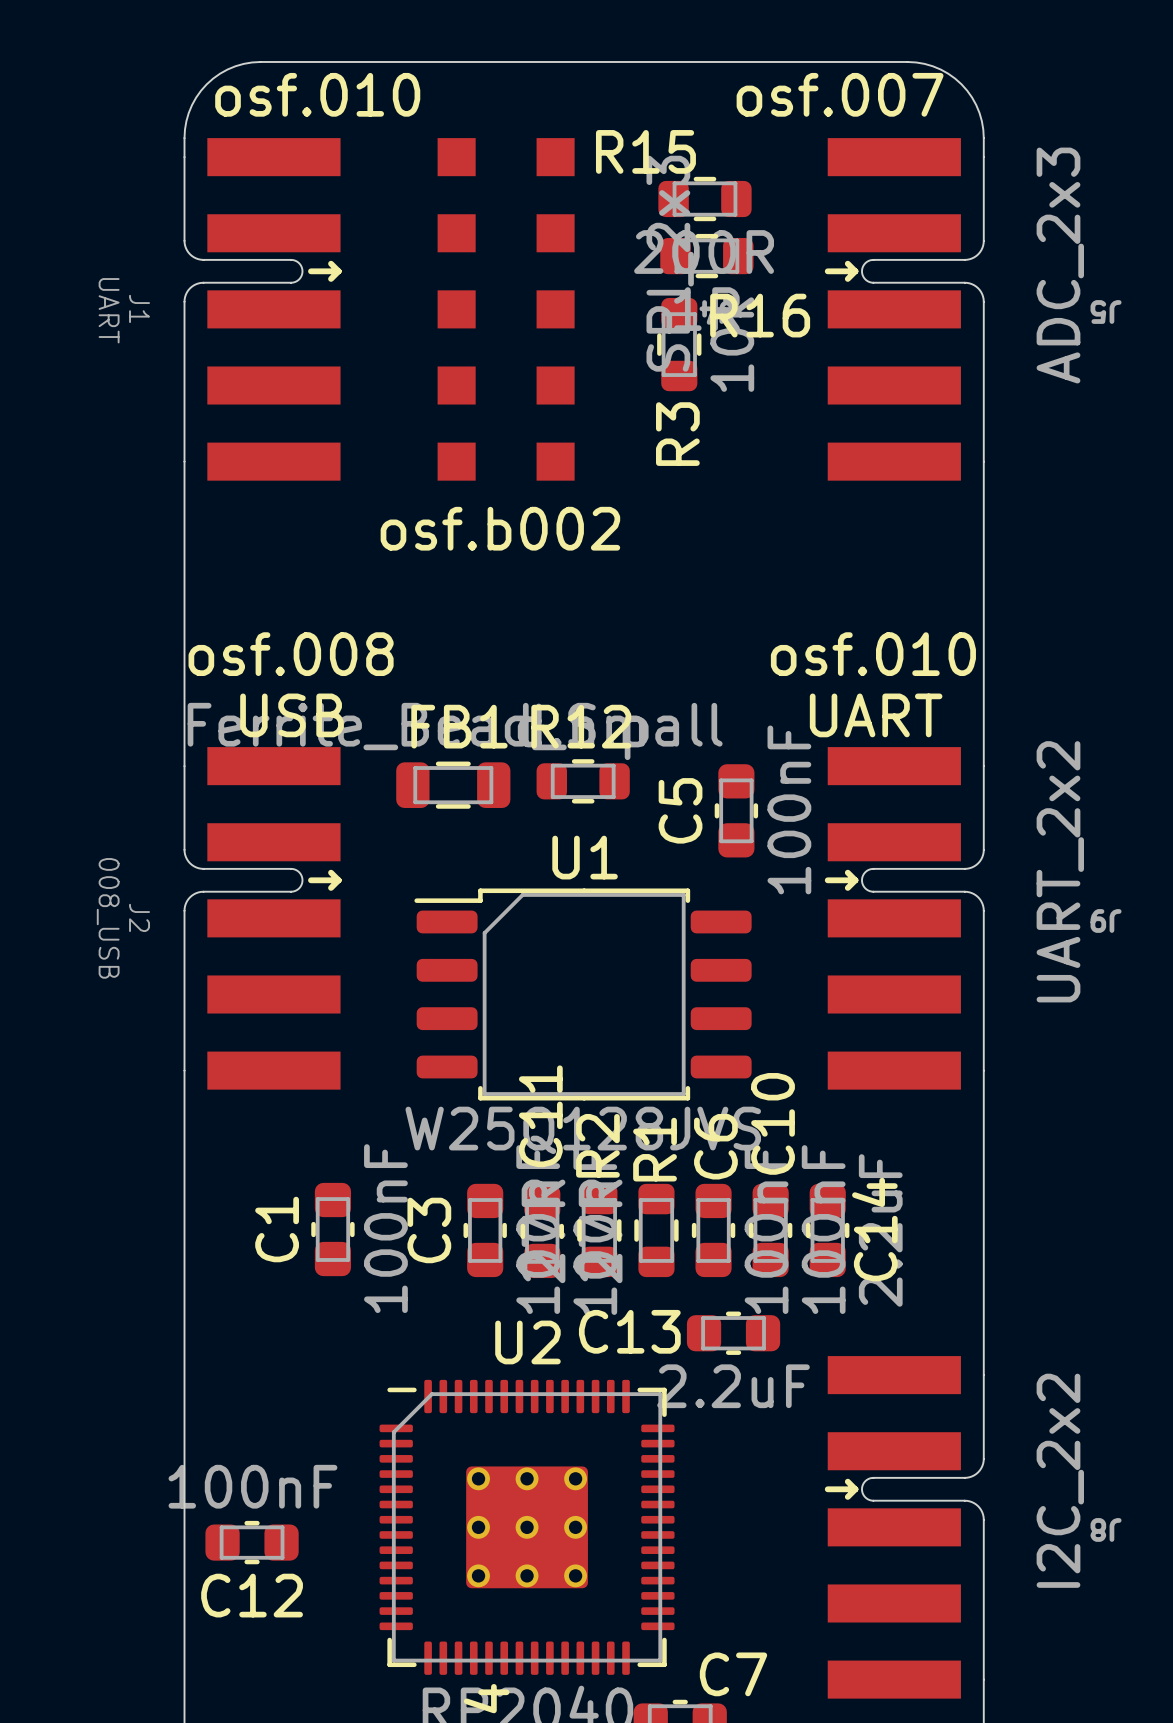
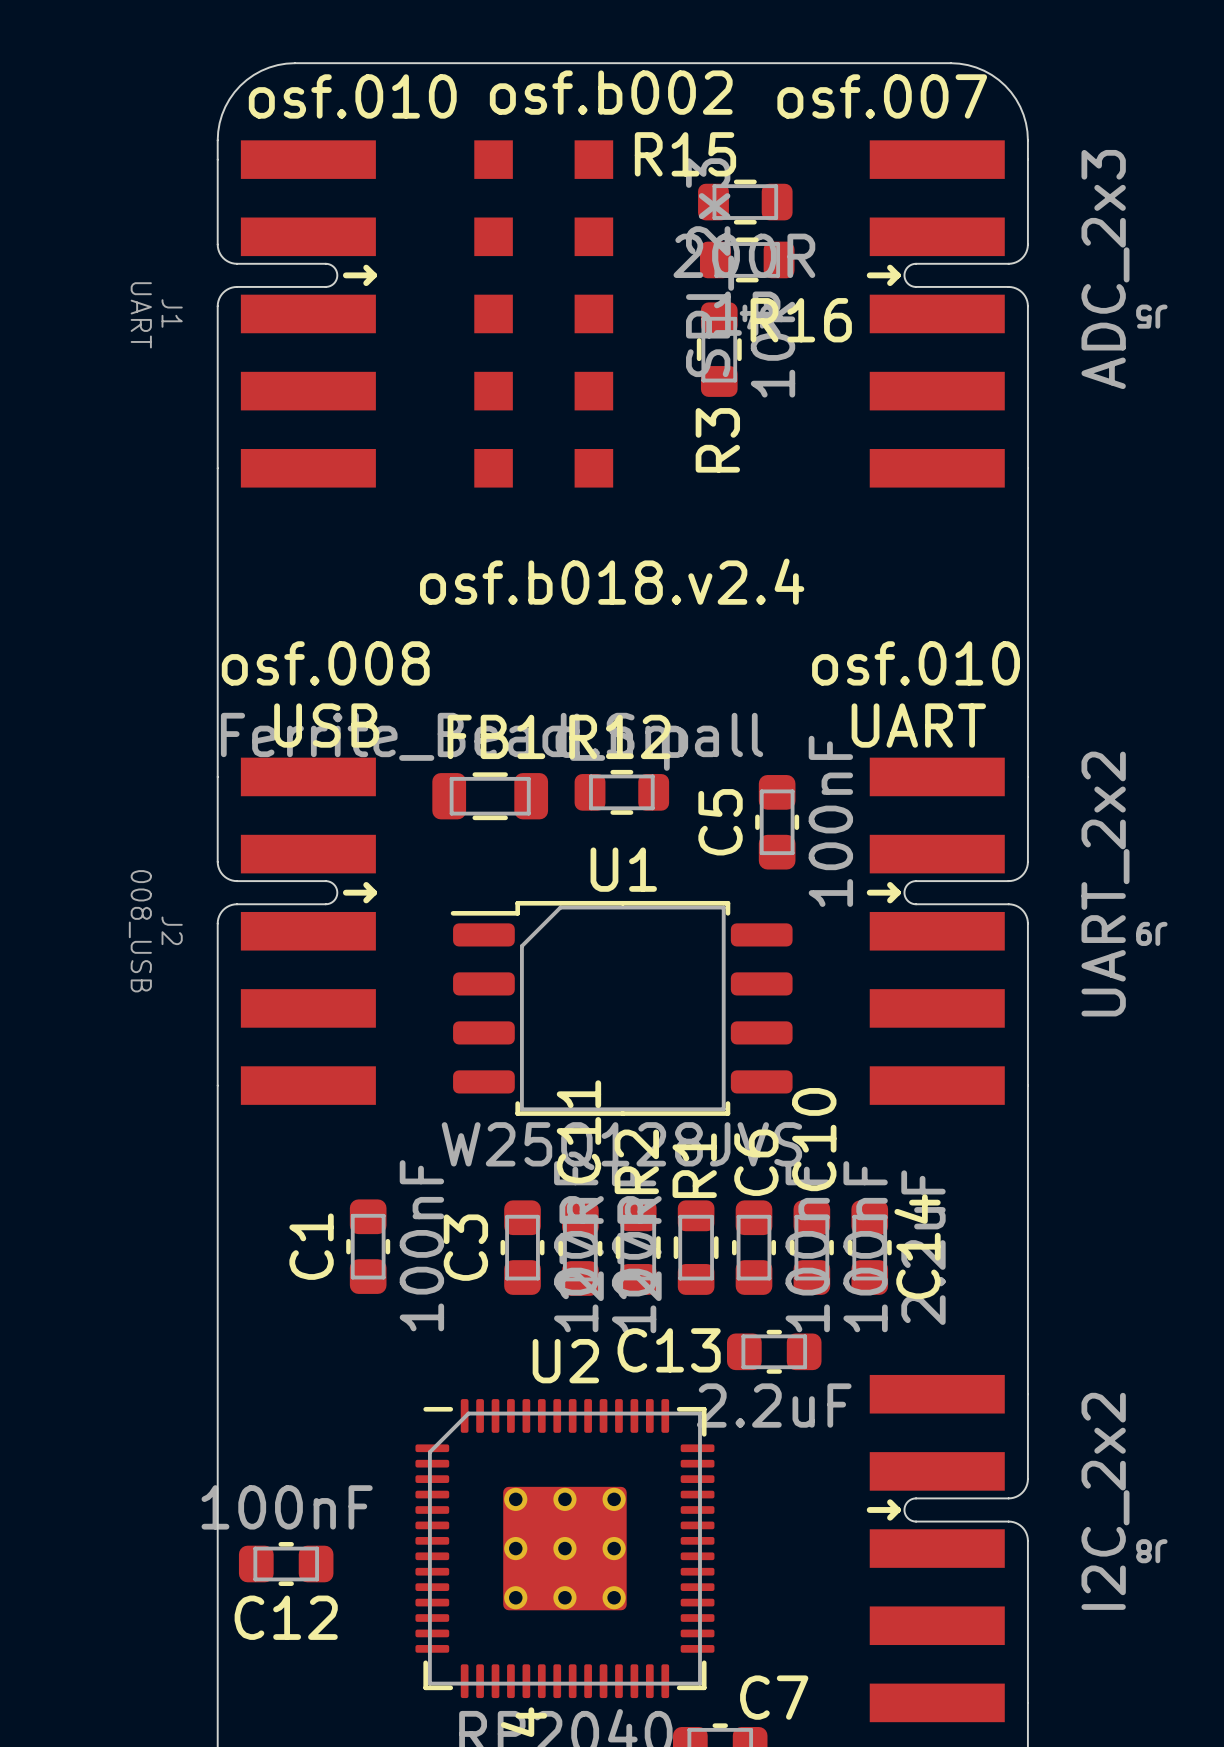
text position: osf.b002 (500, 528) -> osf.b002 (611, 92)
text: none -> osf.b018.v2.4 (612, 581)

